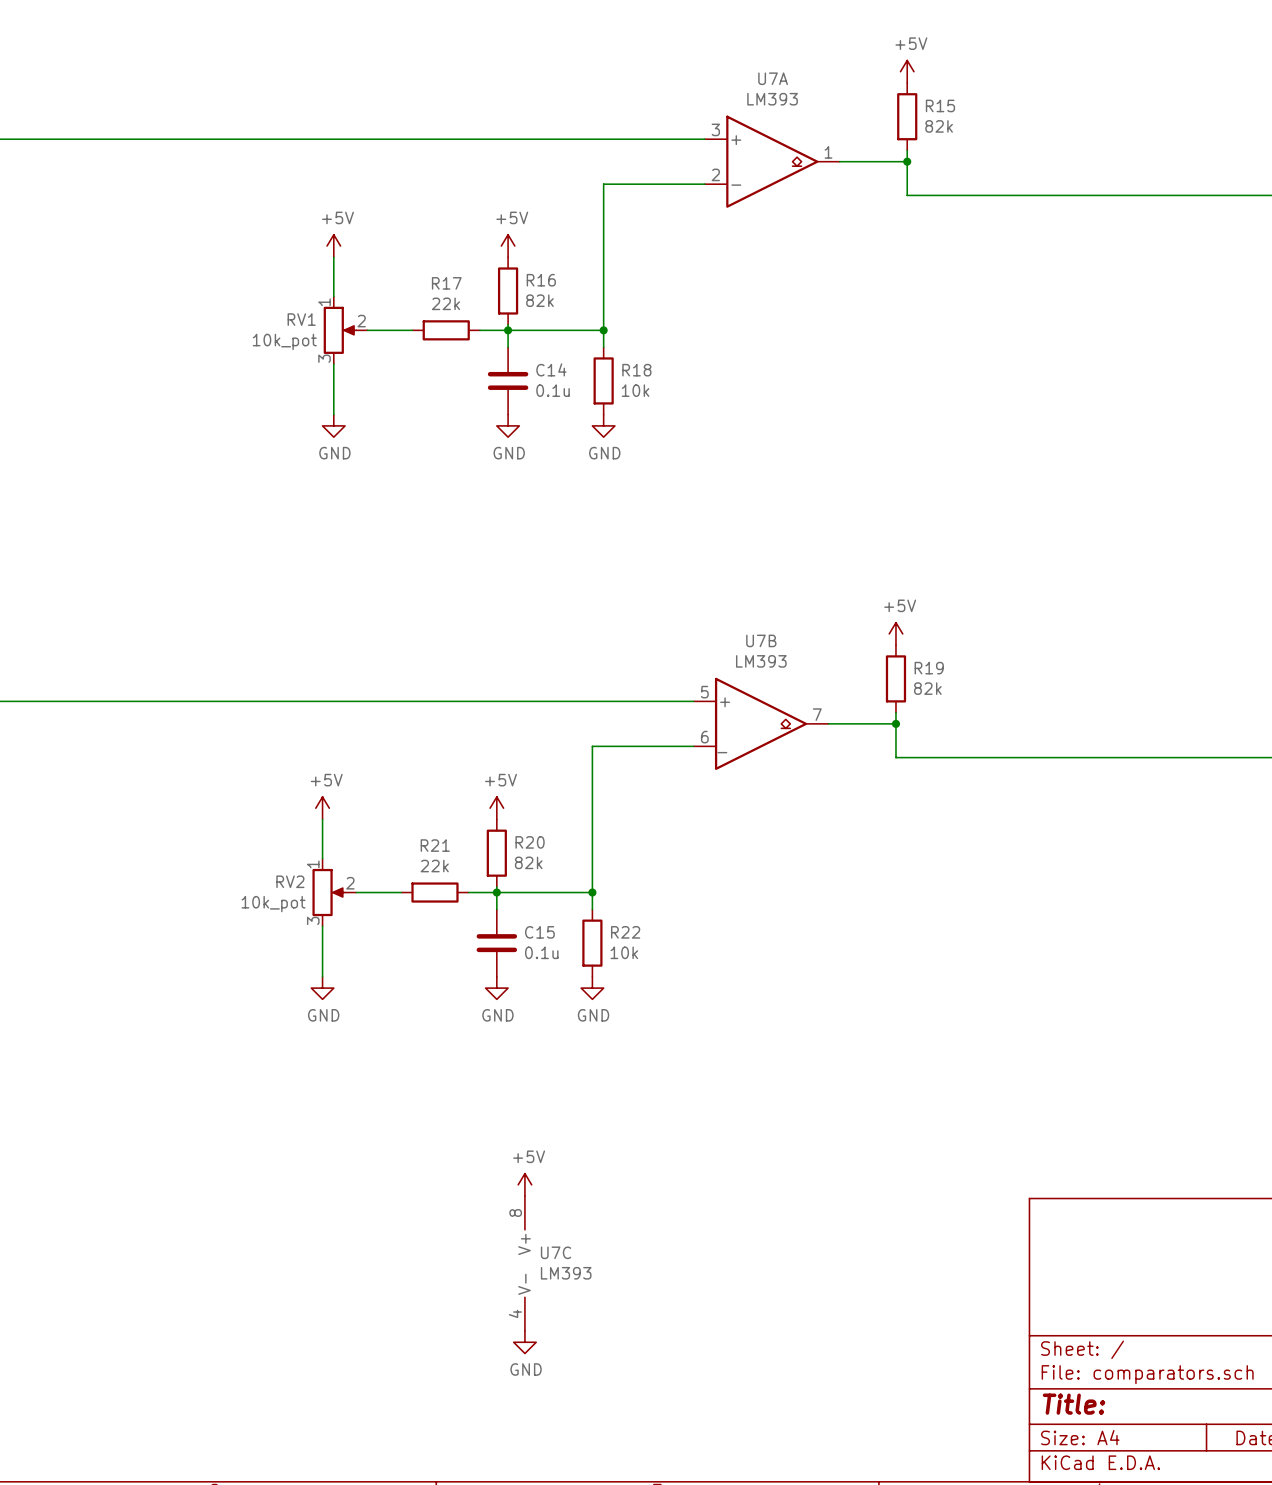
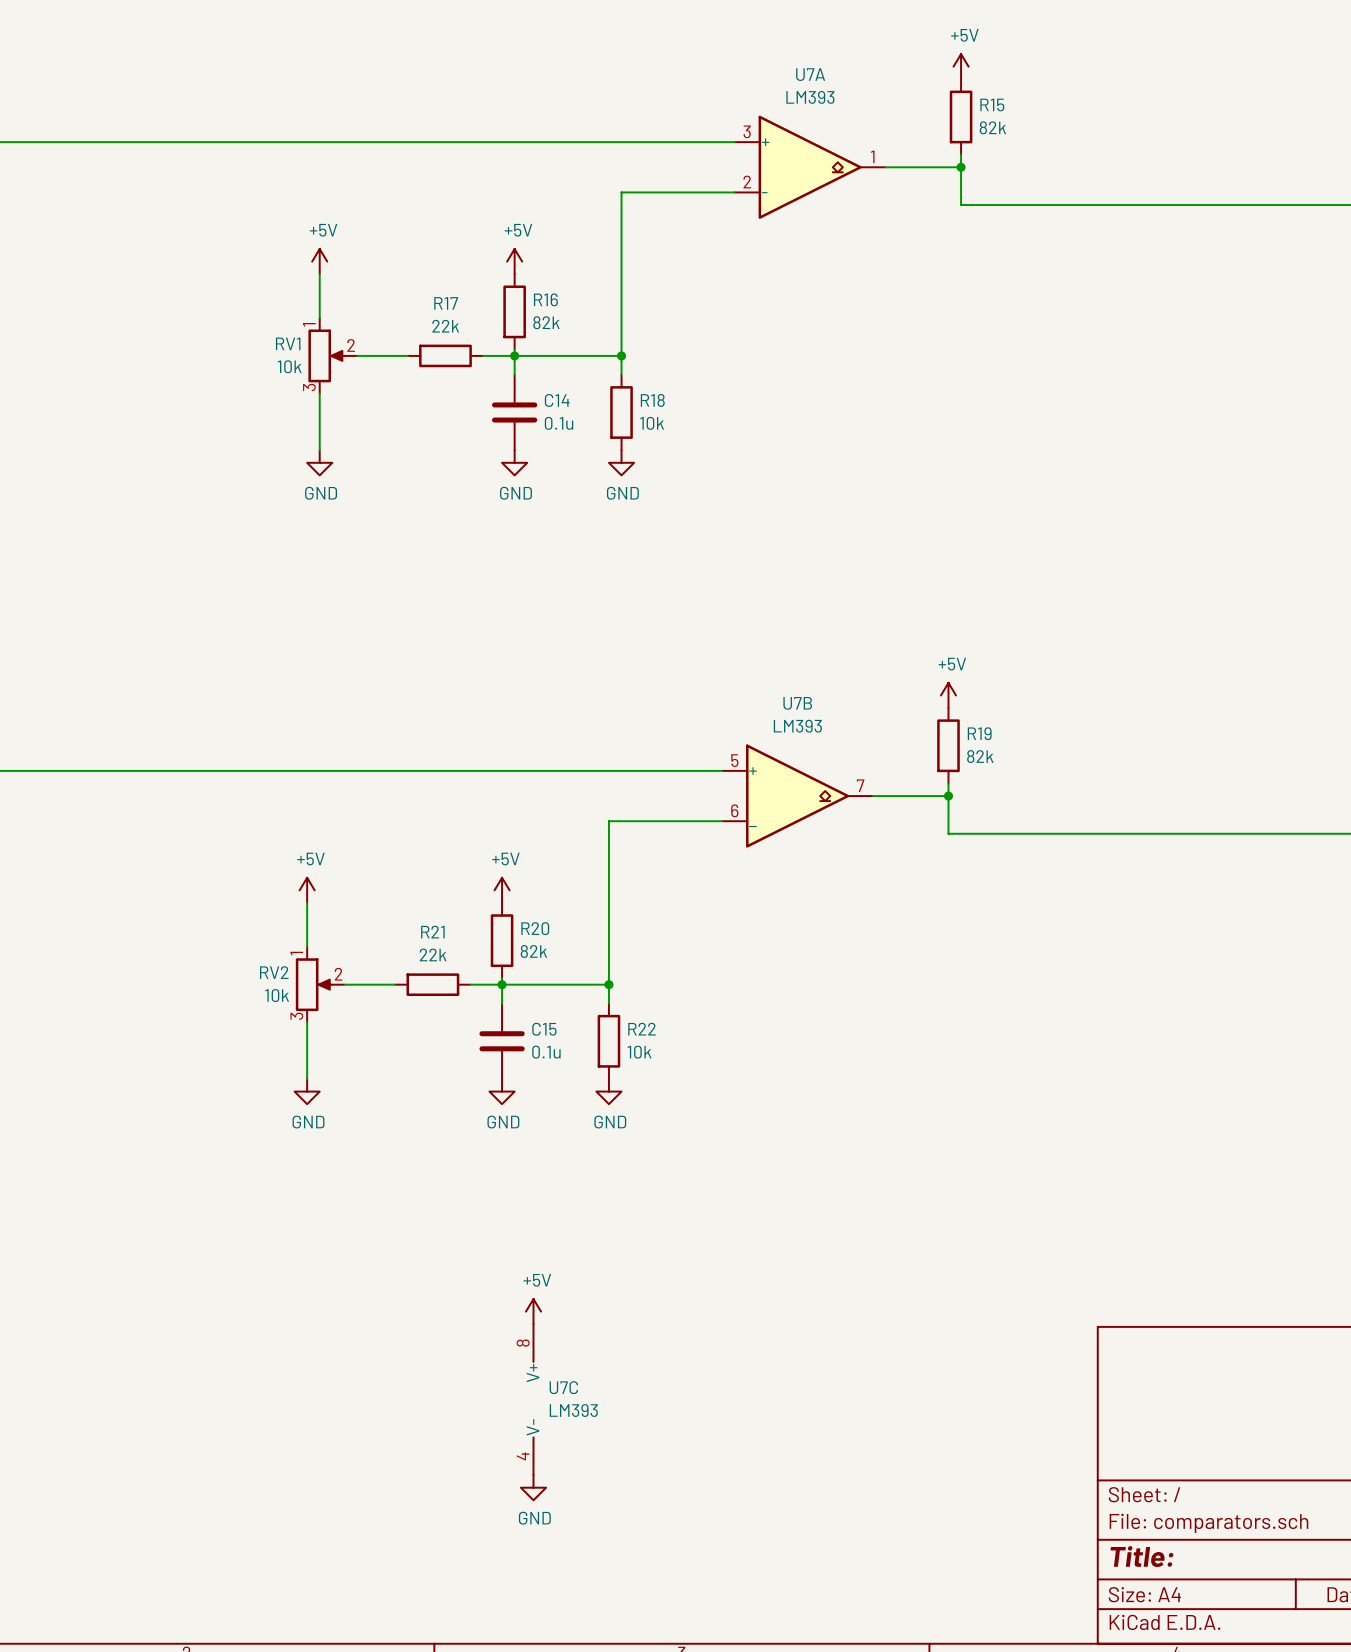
RV1 value: 10k_pot (284, 341) -> 10k (289, 366)
RV2 value: 10k_pot (273, 904) -> 10k (277, 995)

